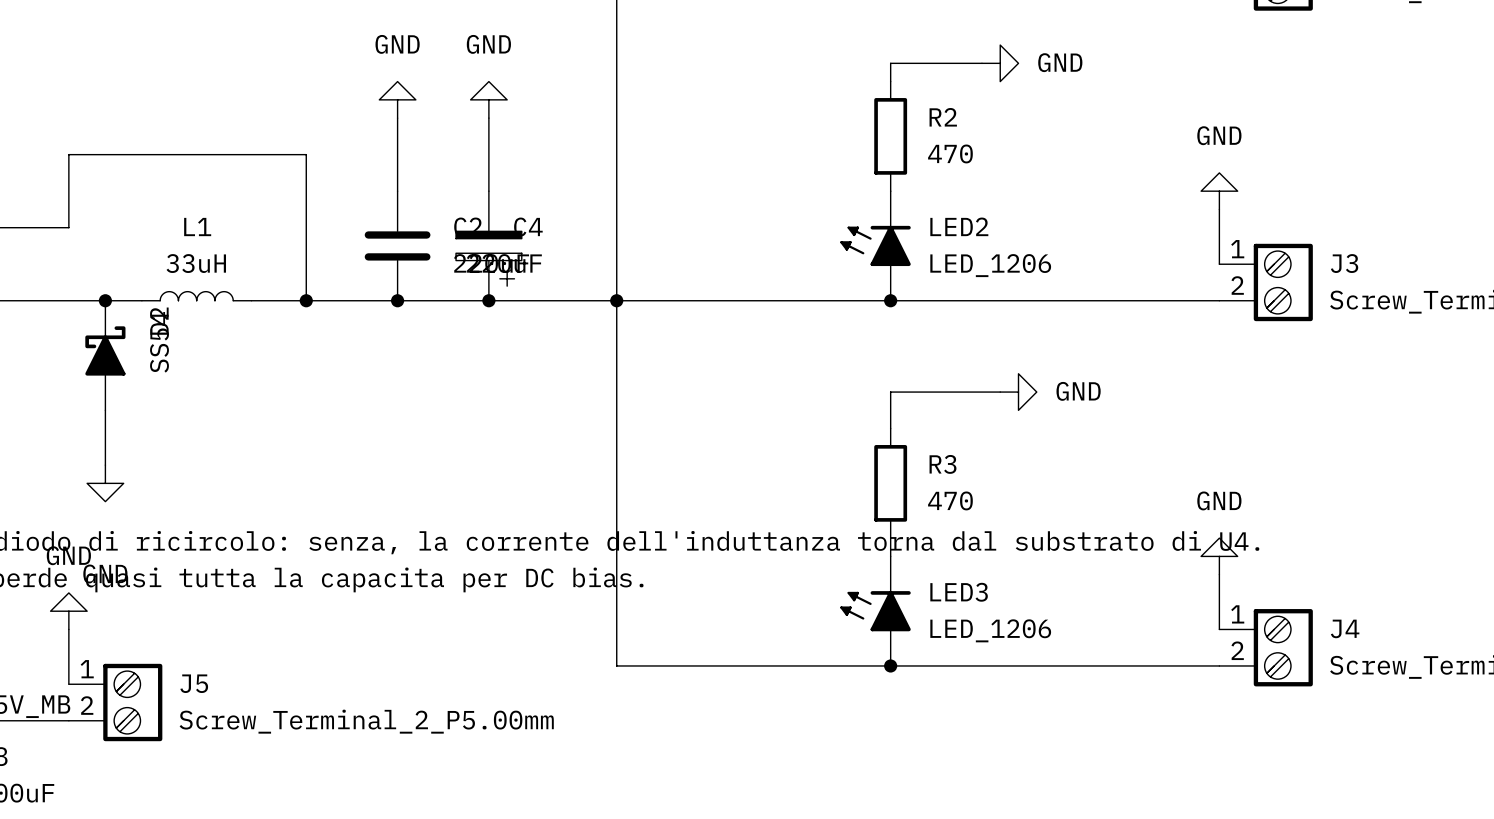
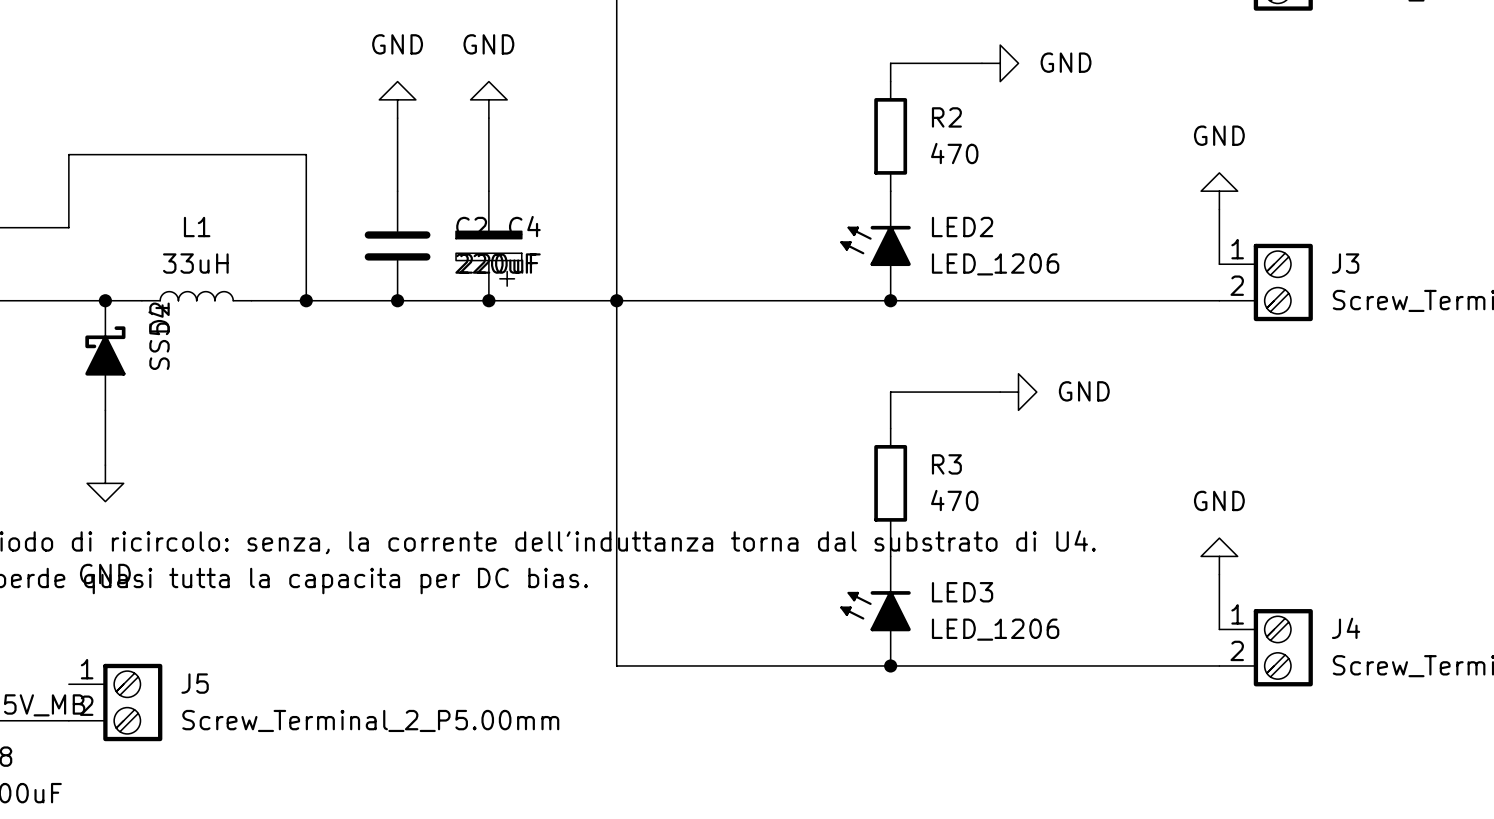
power symbol: GND (68, 611) -> none
wire: (68, 629) (68, 684) -> none

